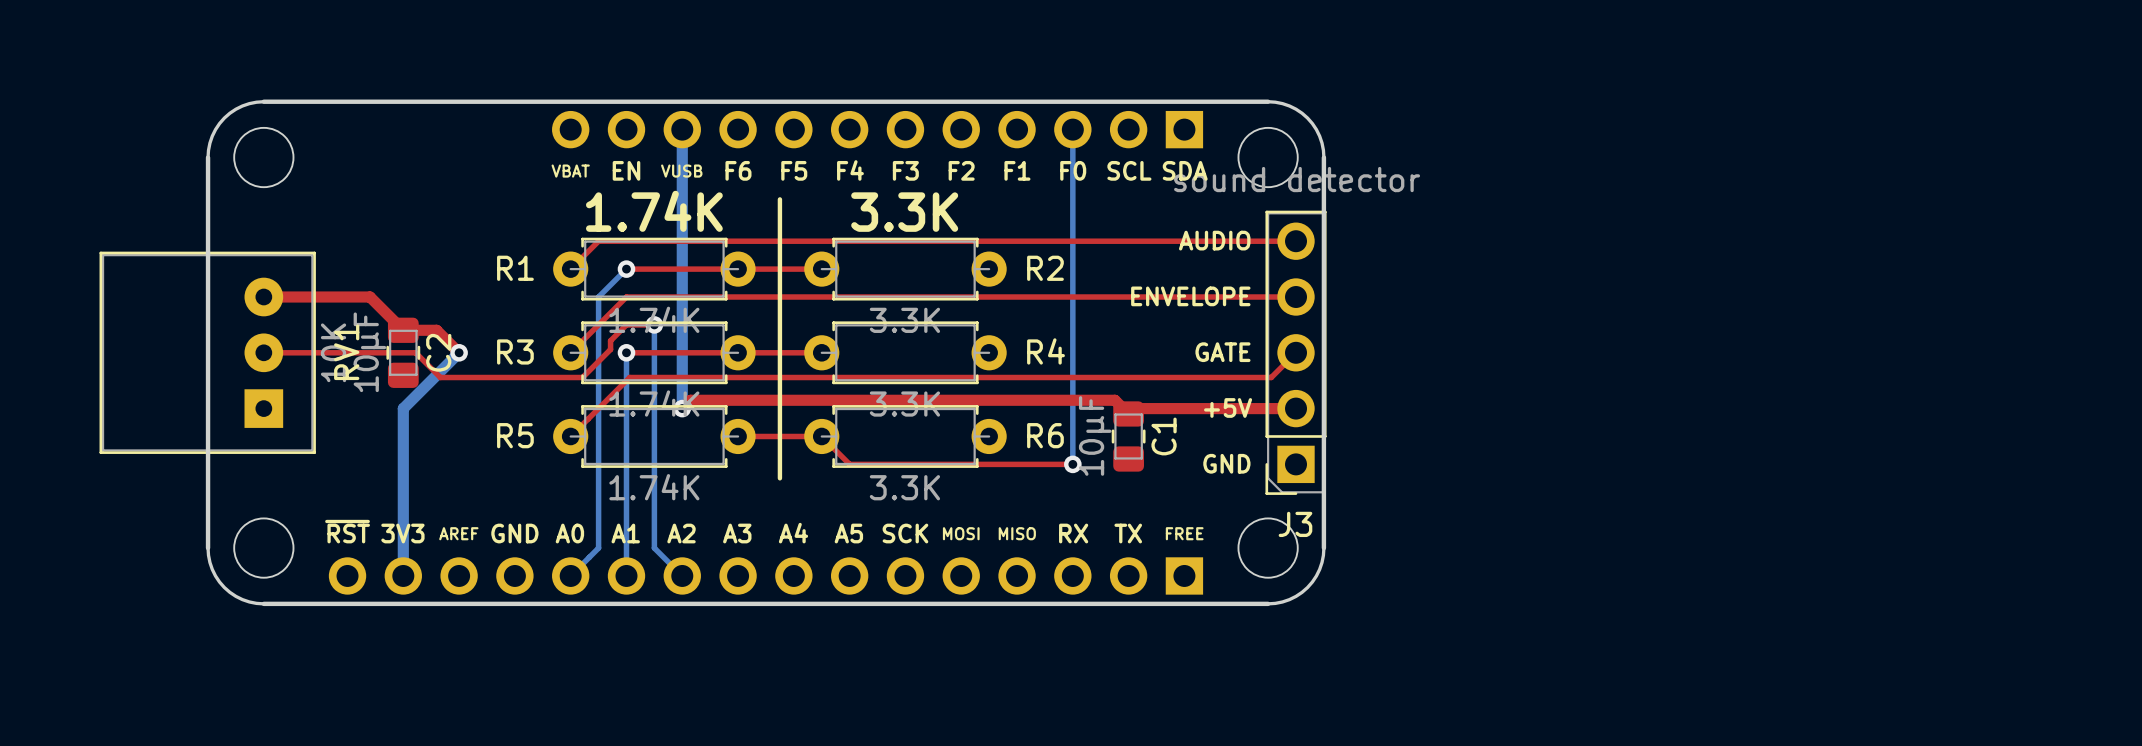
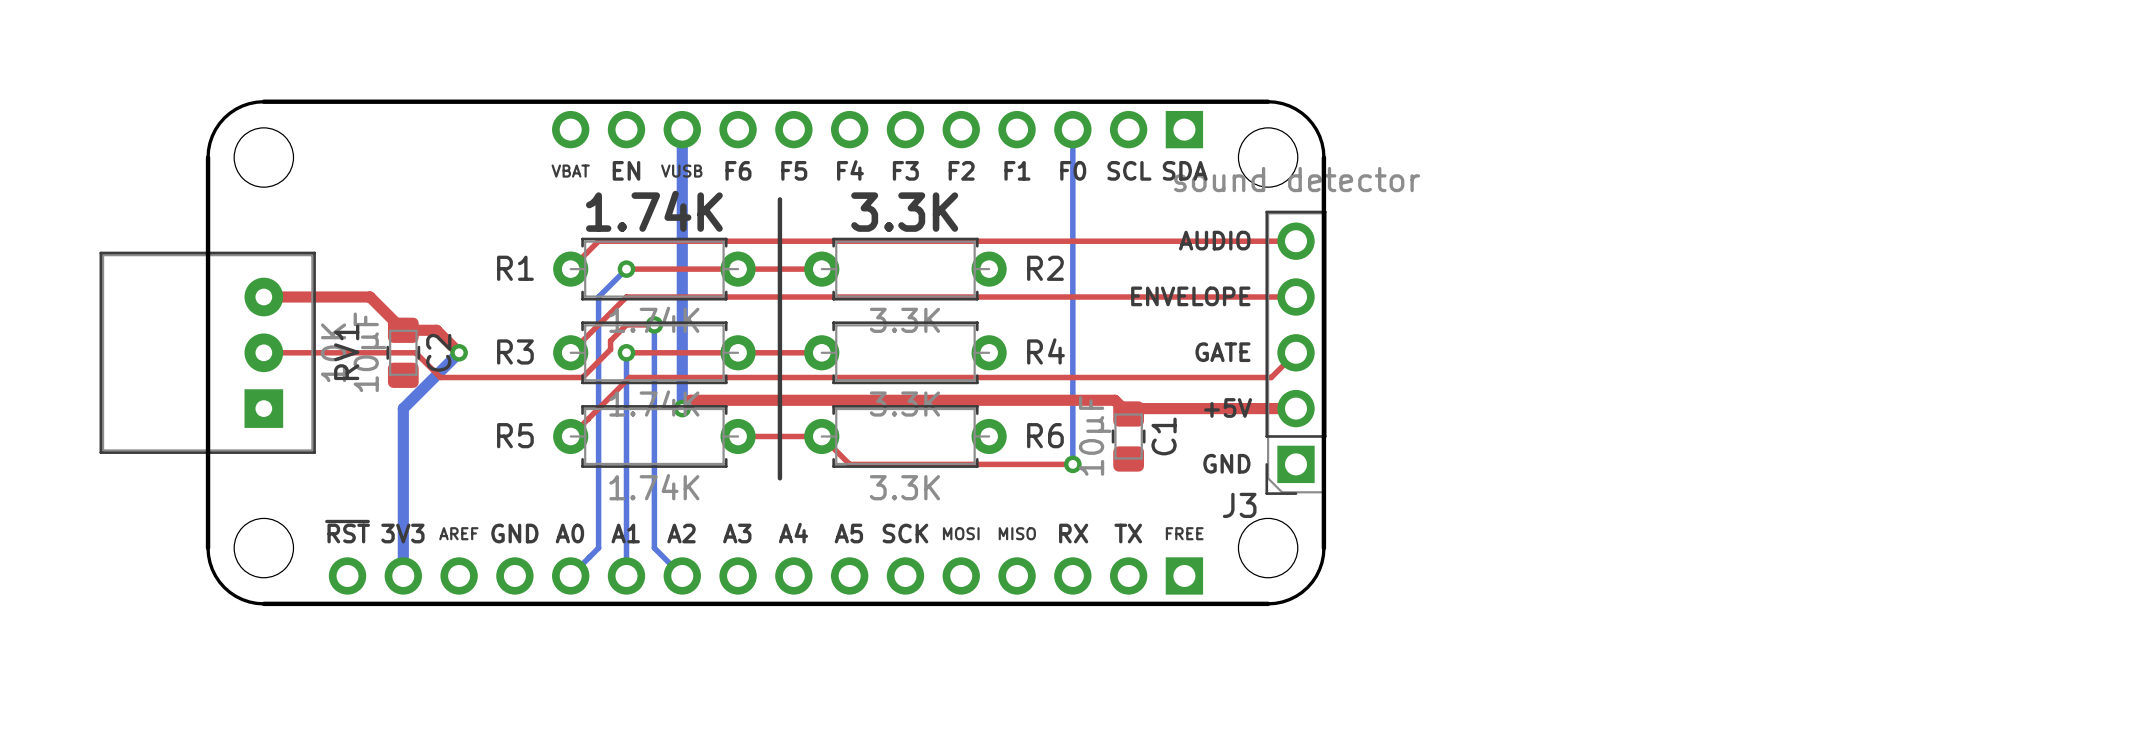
J3 name position: J3 (1295, 524) -> J3 (1239, 505)

